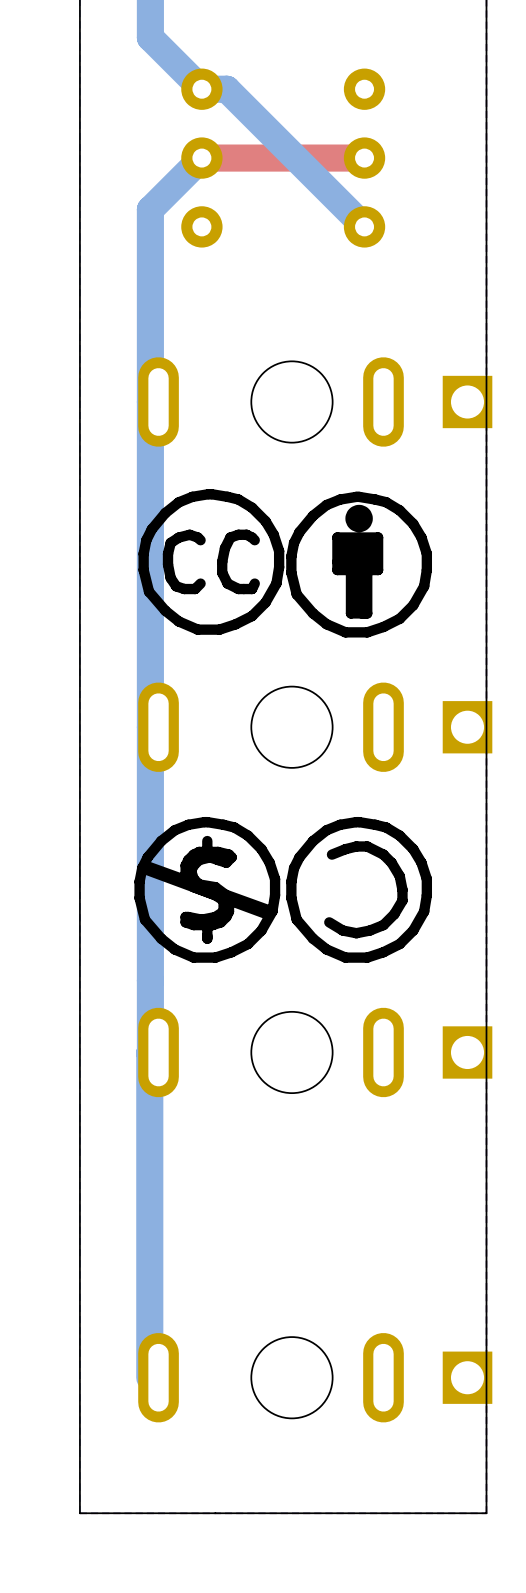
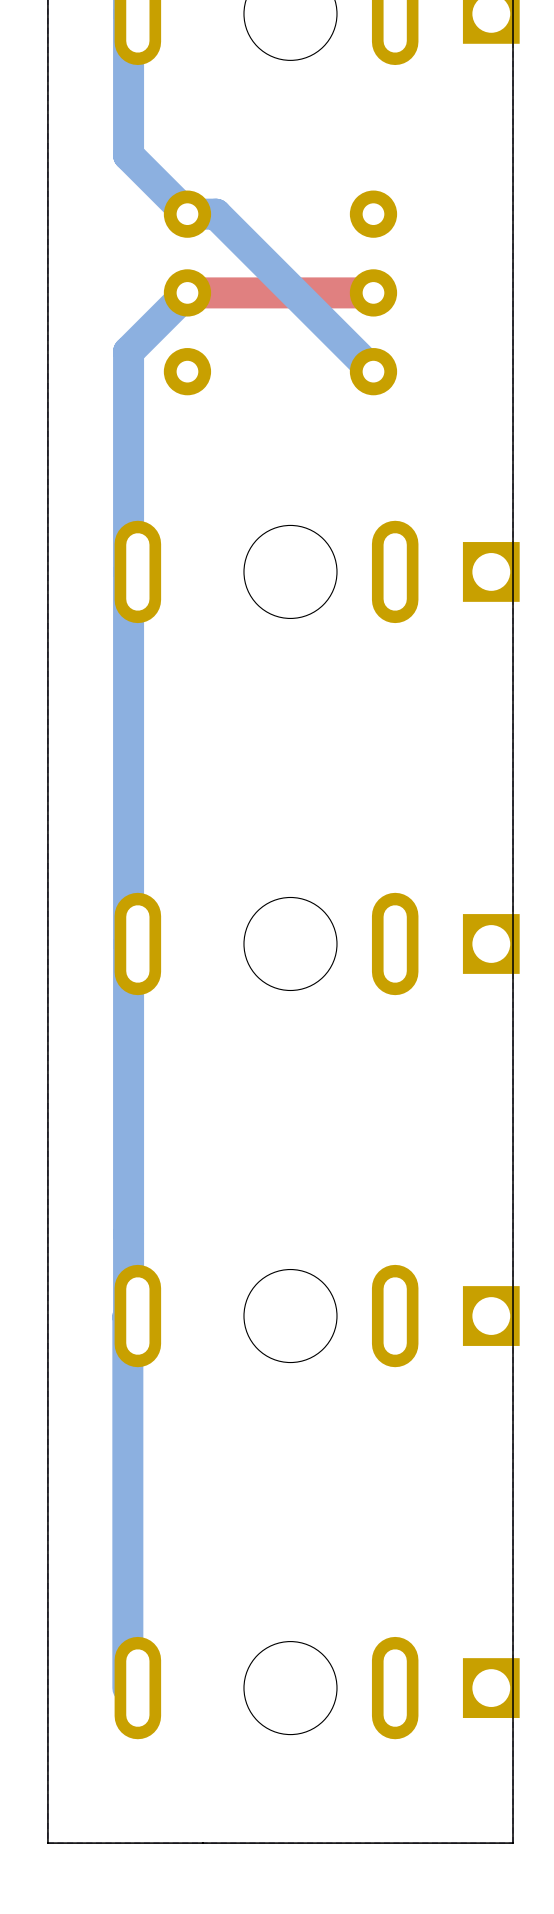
drawing: [138, 489, 433, 638] -> none
drawing: [134, 816, 433, 963] -> none

